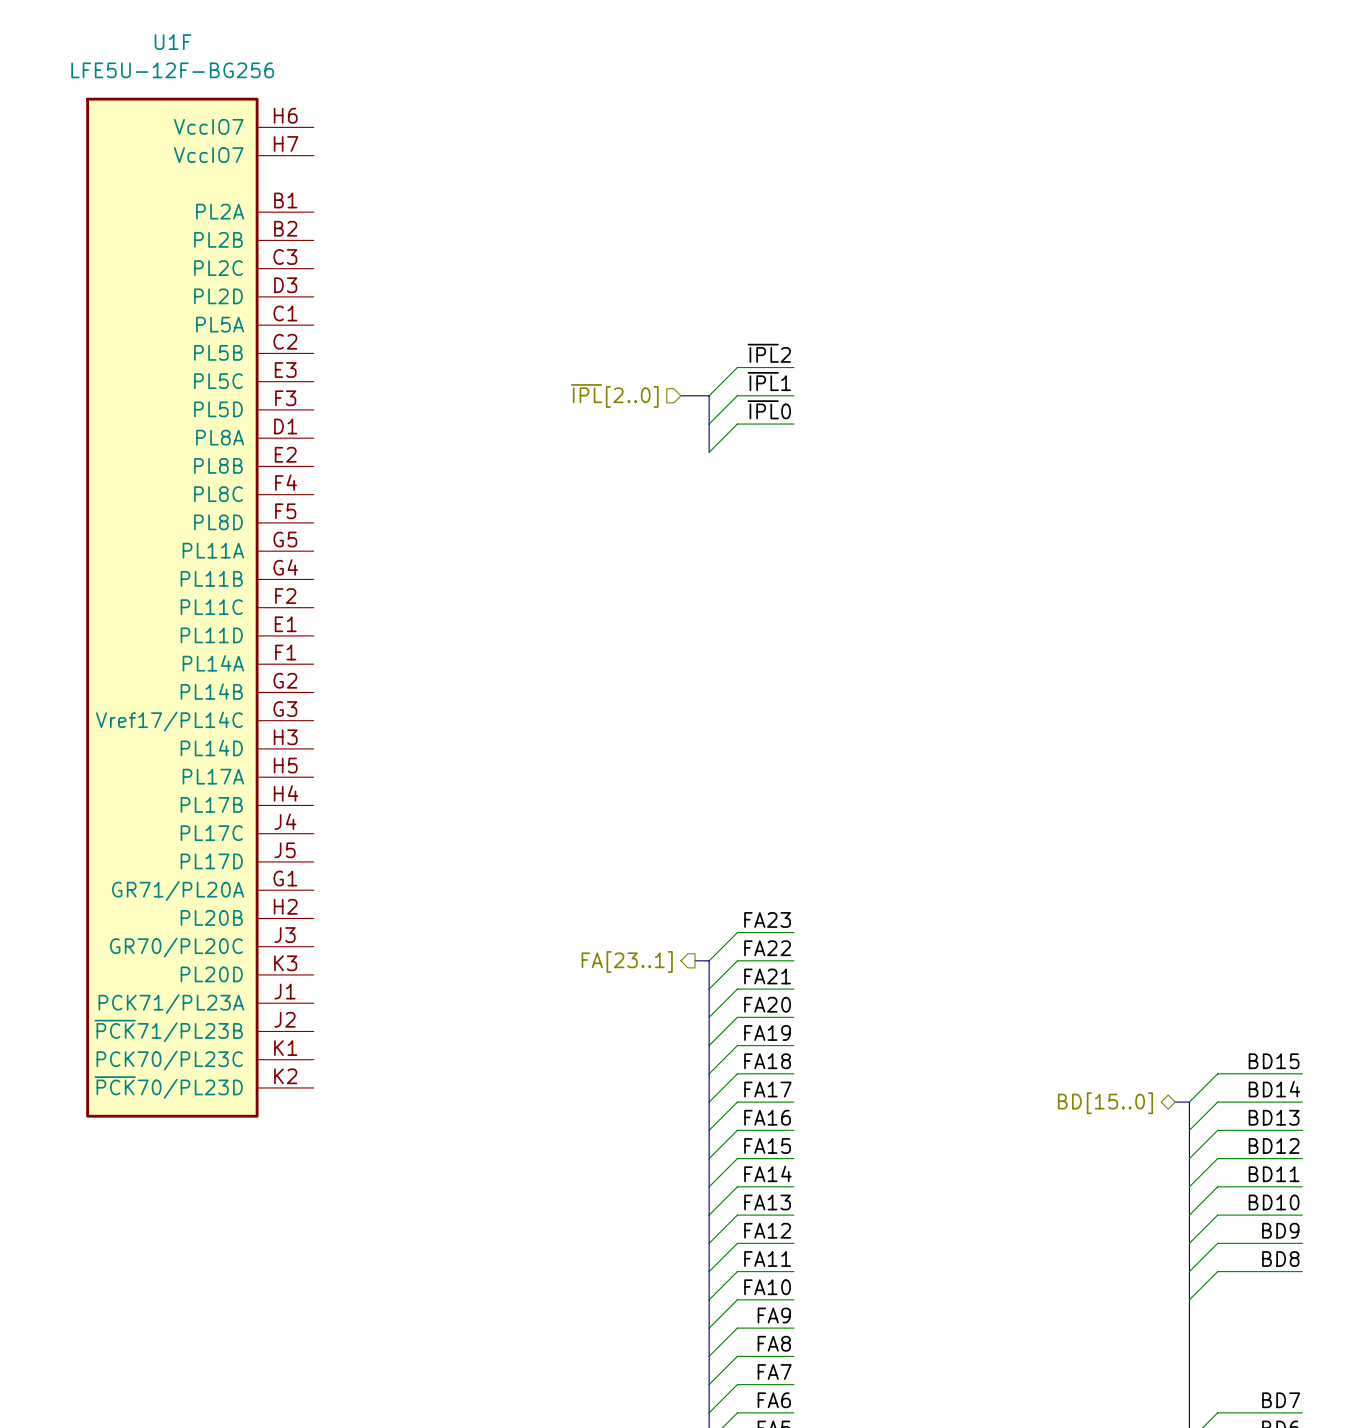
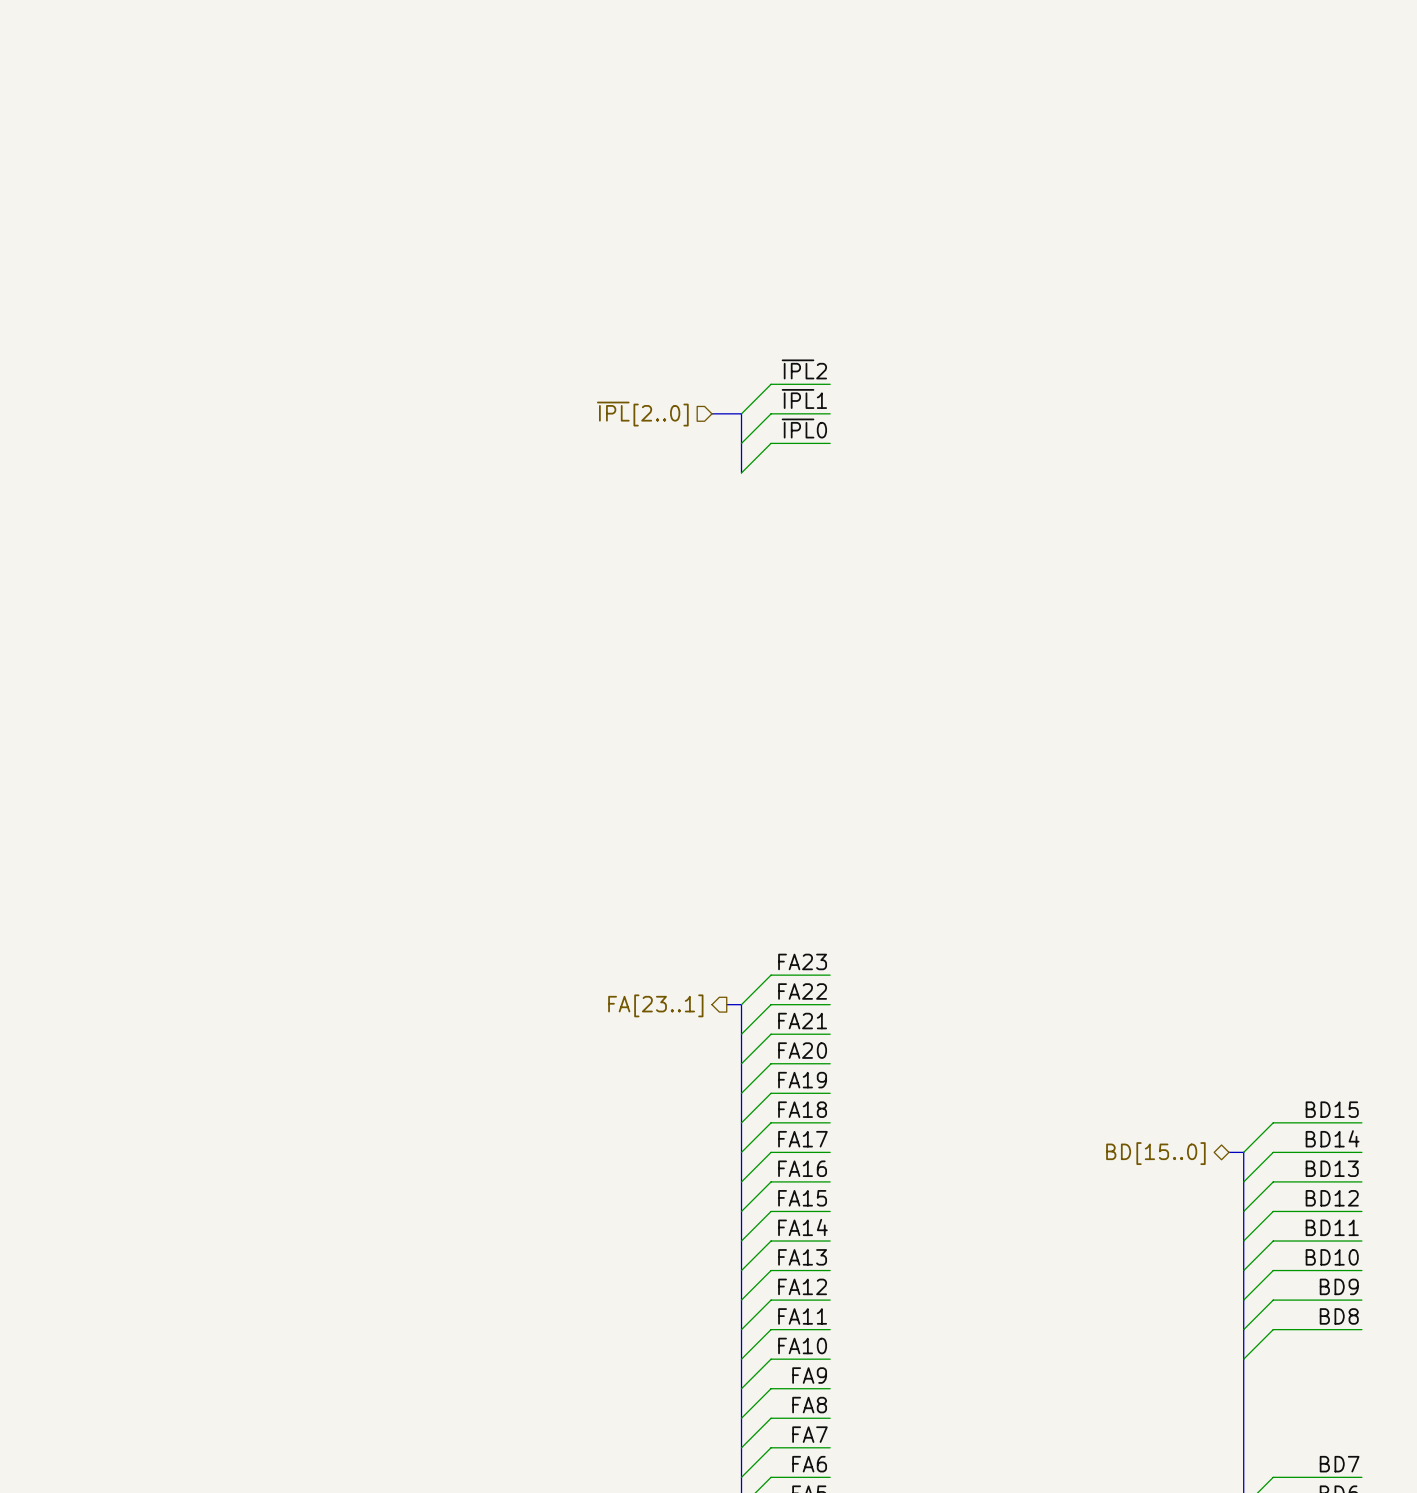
U1F: LFE5U-12F-BG256 (199, 607) -> none

